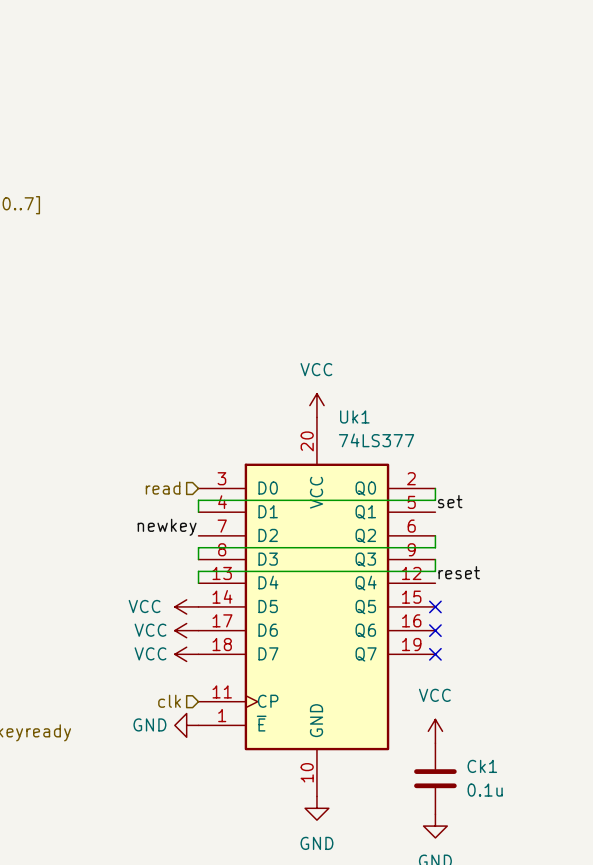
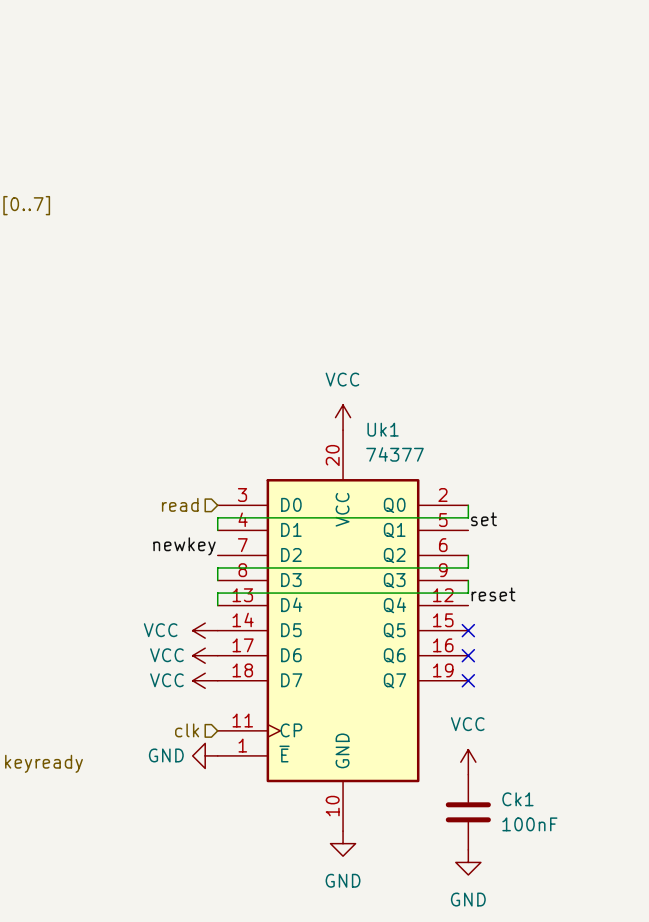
Uk1 value: 74LS377 (376, 440) -> 74377 (395, 454)
Ck1 value: 0.1u (485, 790) -> 100nF (529, 824)

